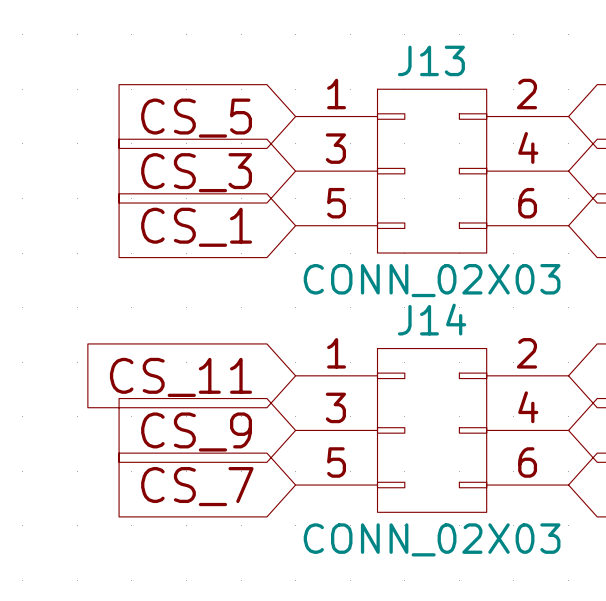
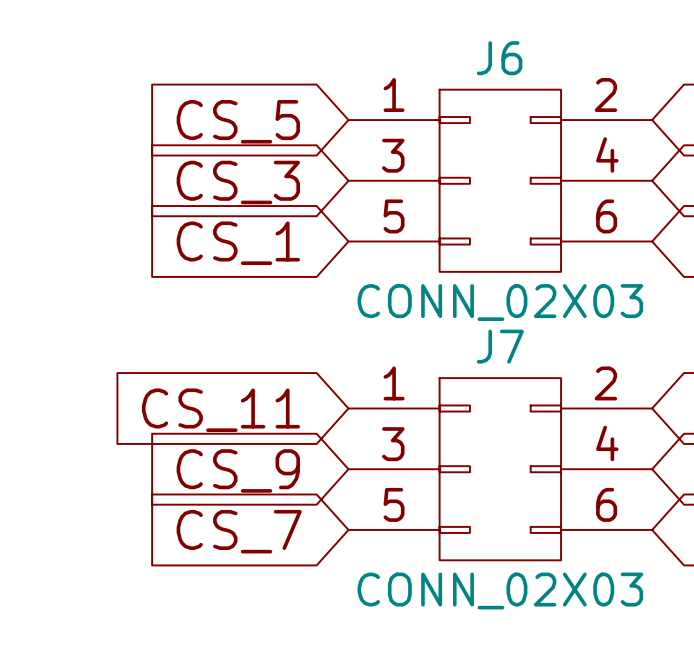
J13 name: J13 (431, 60) -> J6 (499, 58)
J14 name: J14 (432, 319) -> J7 (500, 346)

